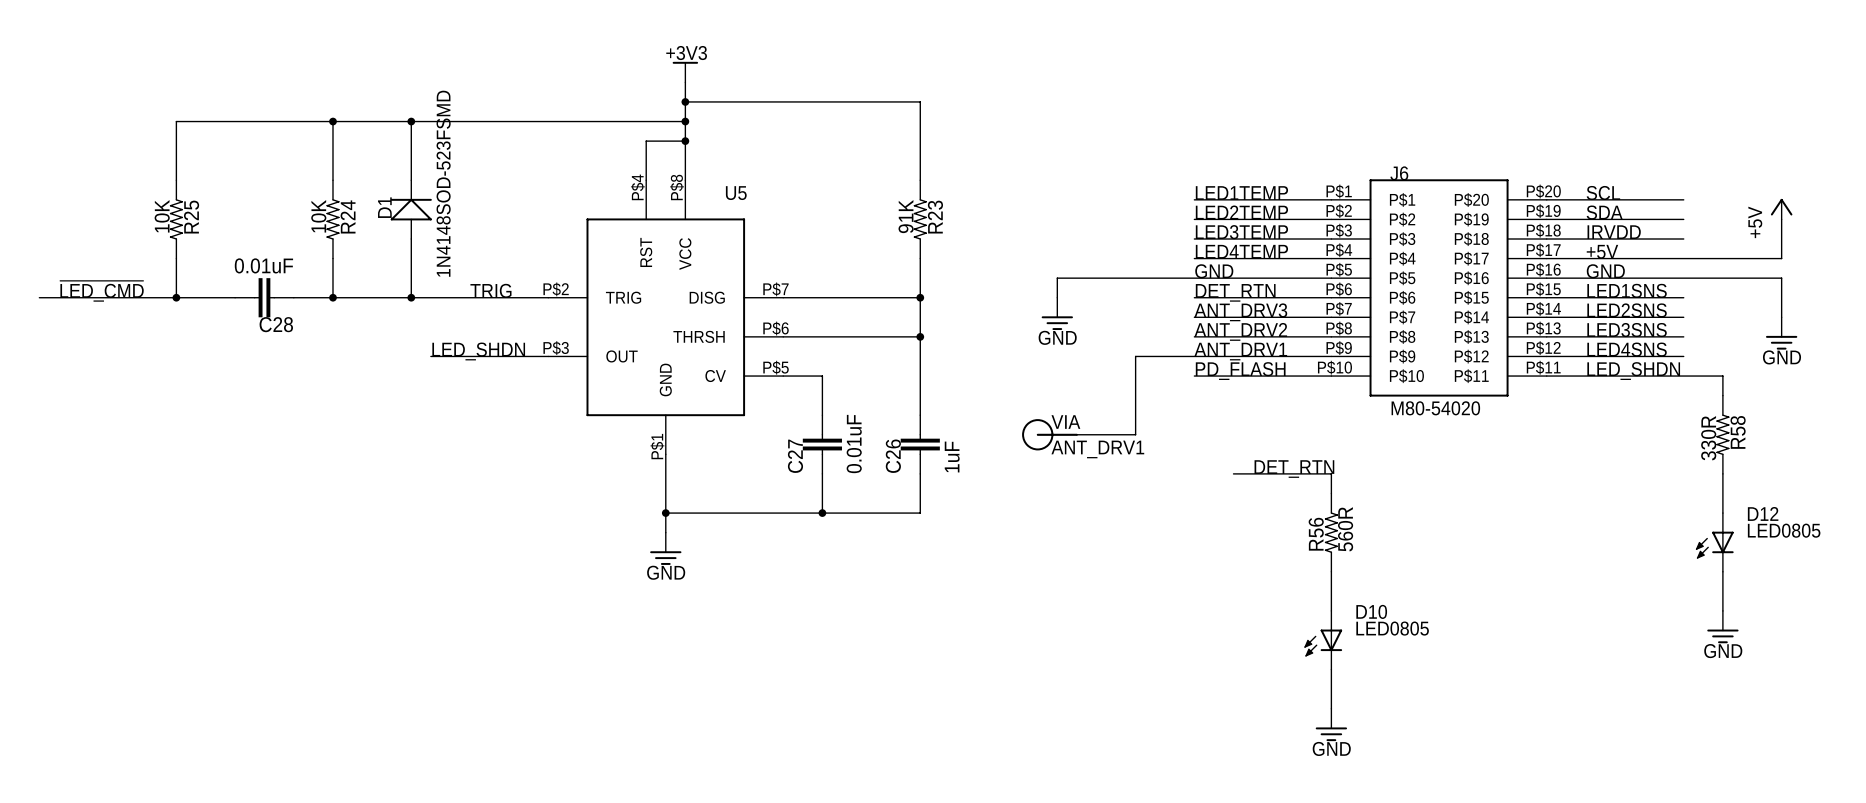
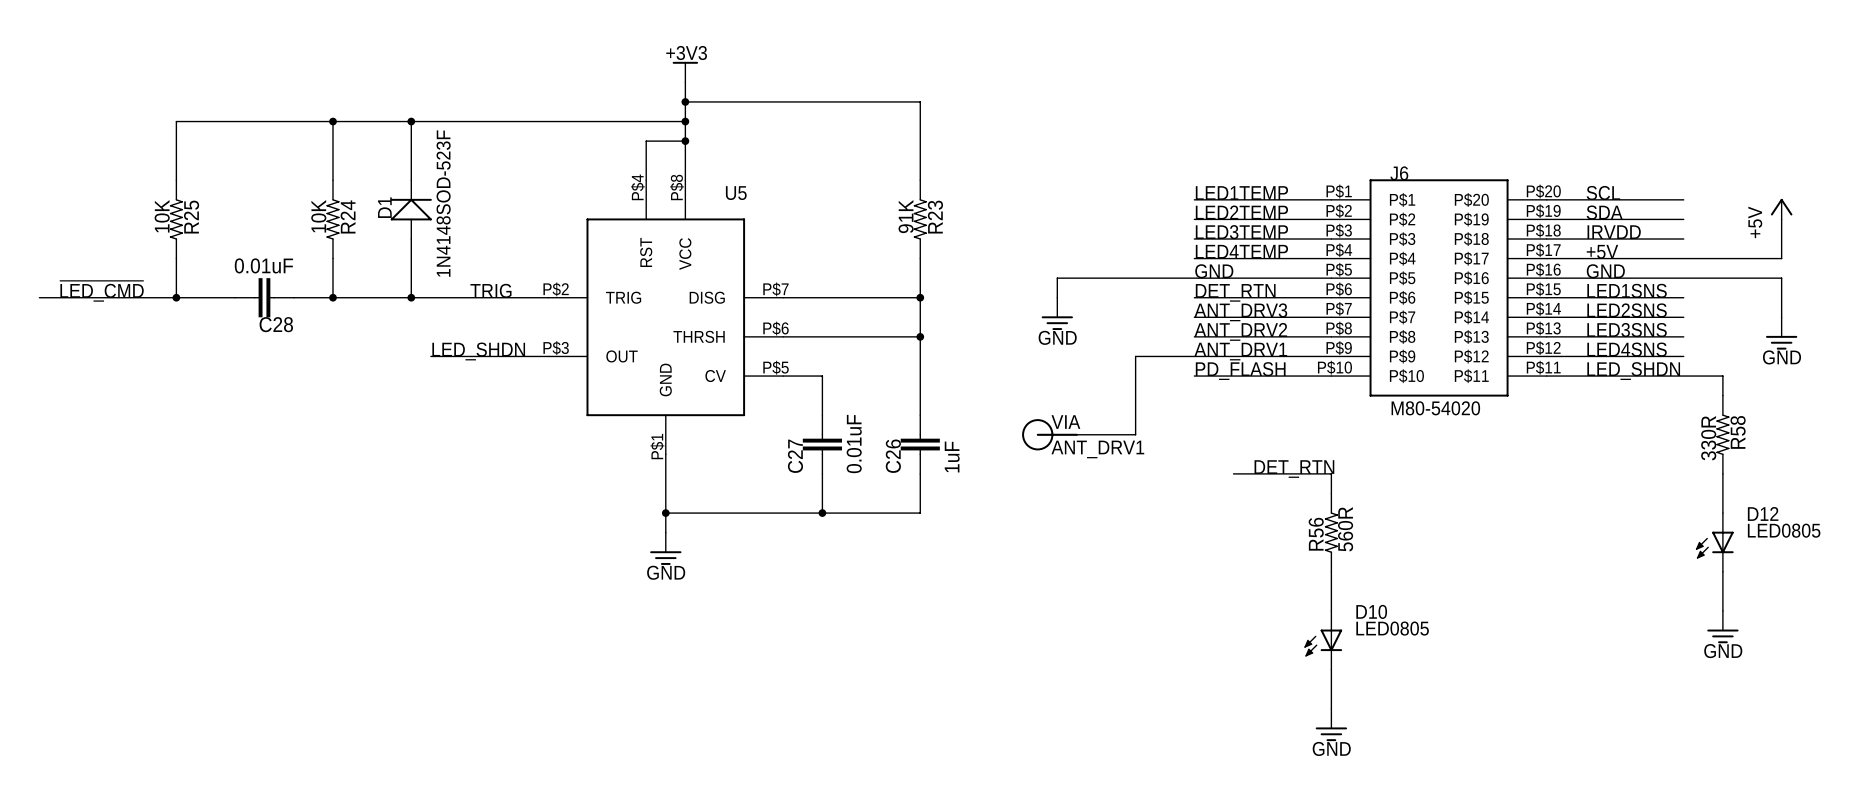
D1 value: 1N4148SOD-523FSMD (443, 183) -> 1N4148SOD-523F (443, 203)

